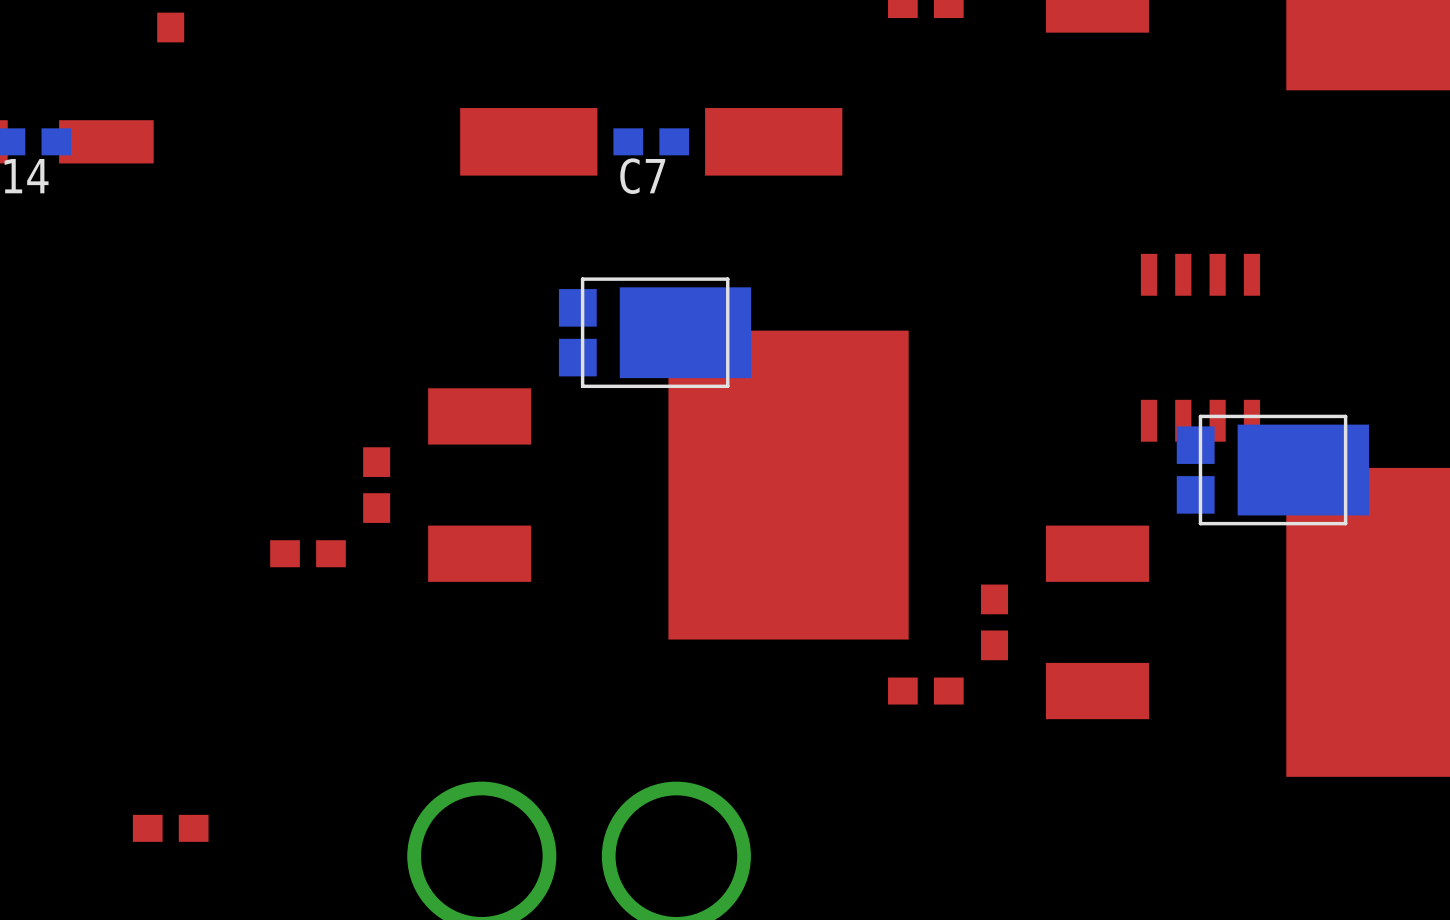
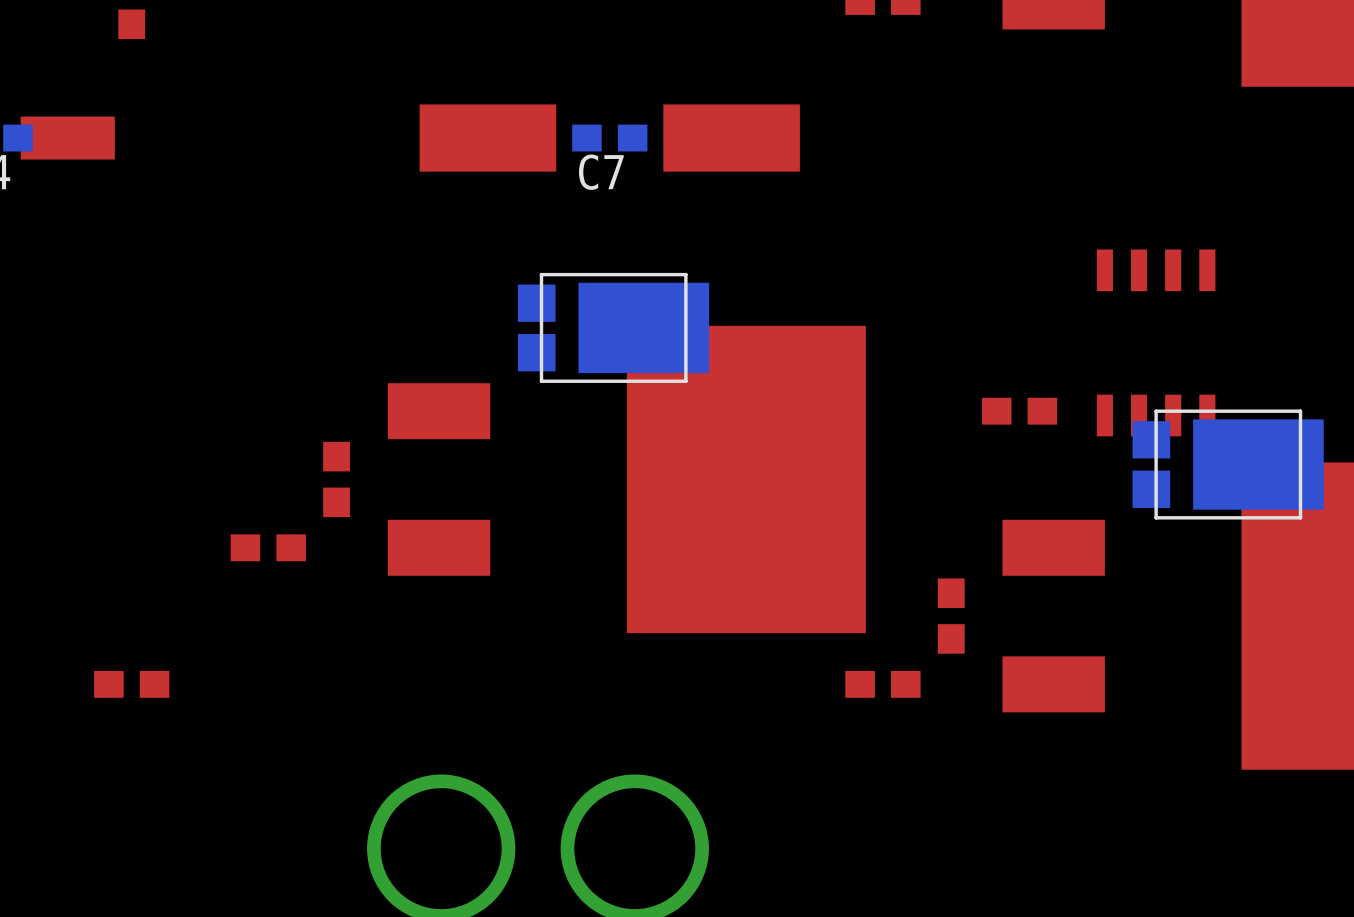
part: none -> (1019, 411)
part position: (170, 828) -> (131, 684)

